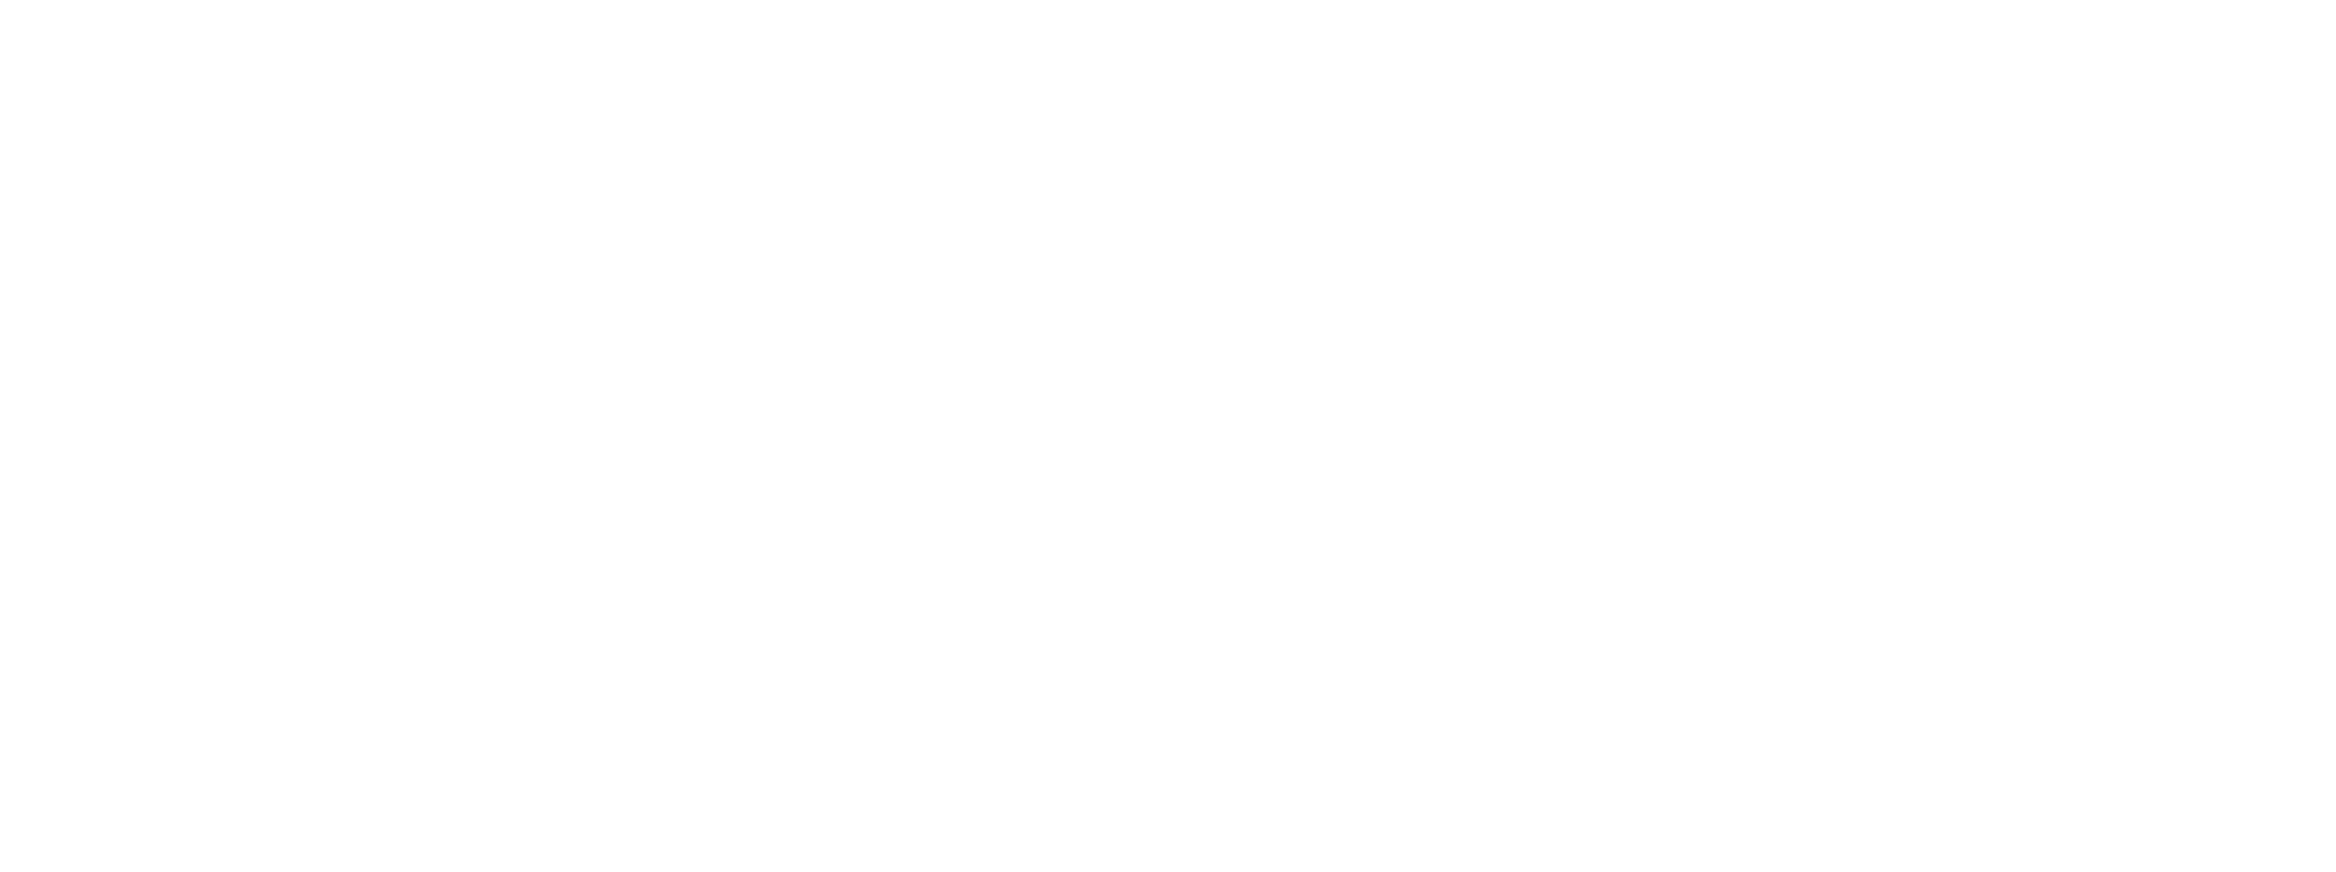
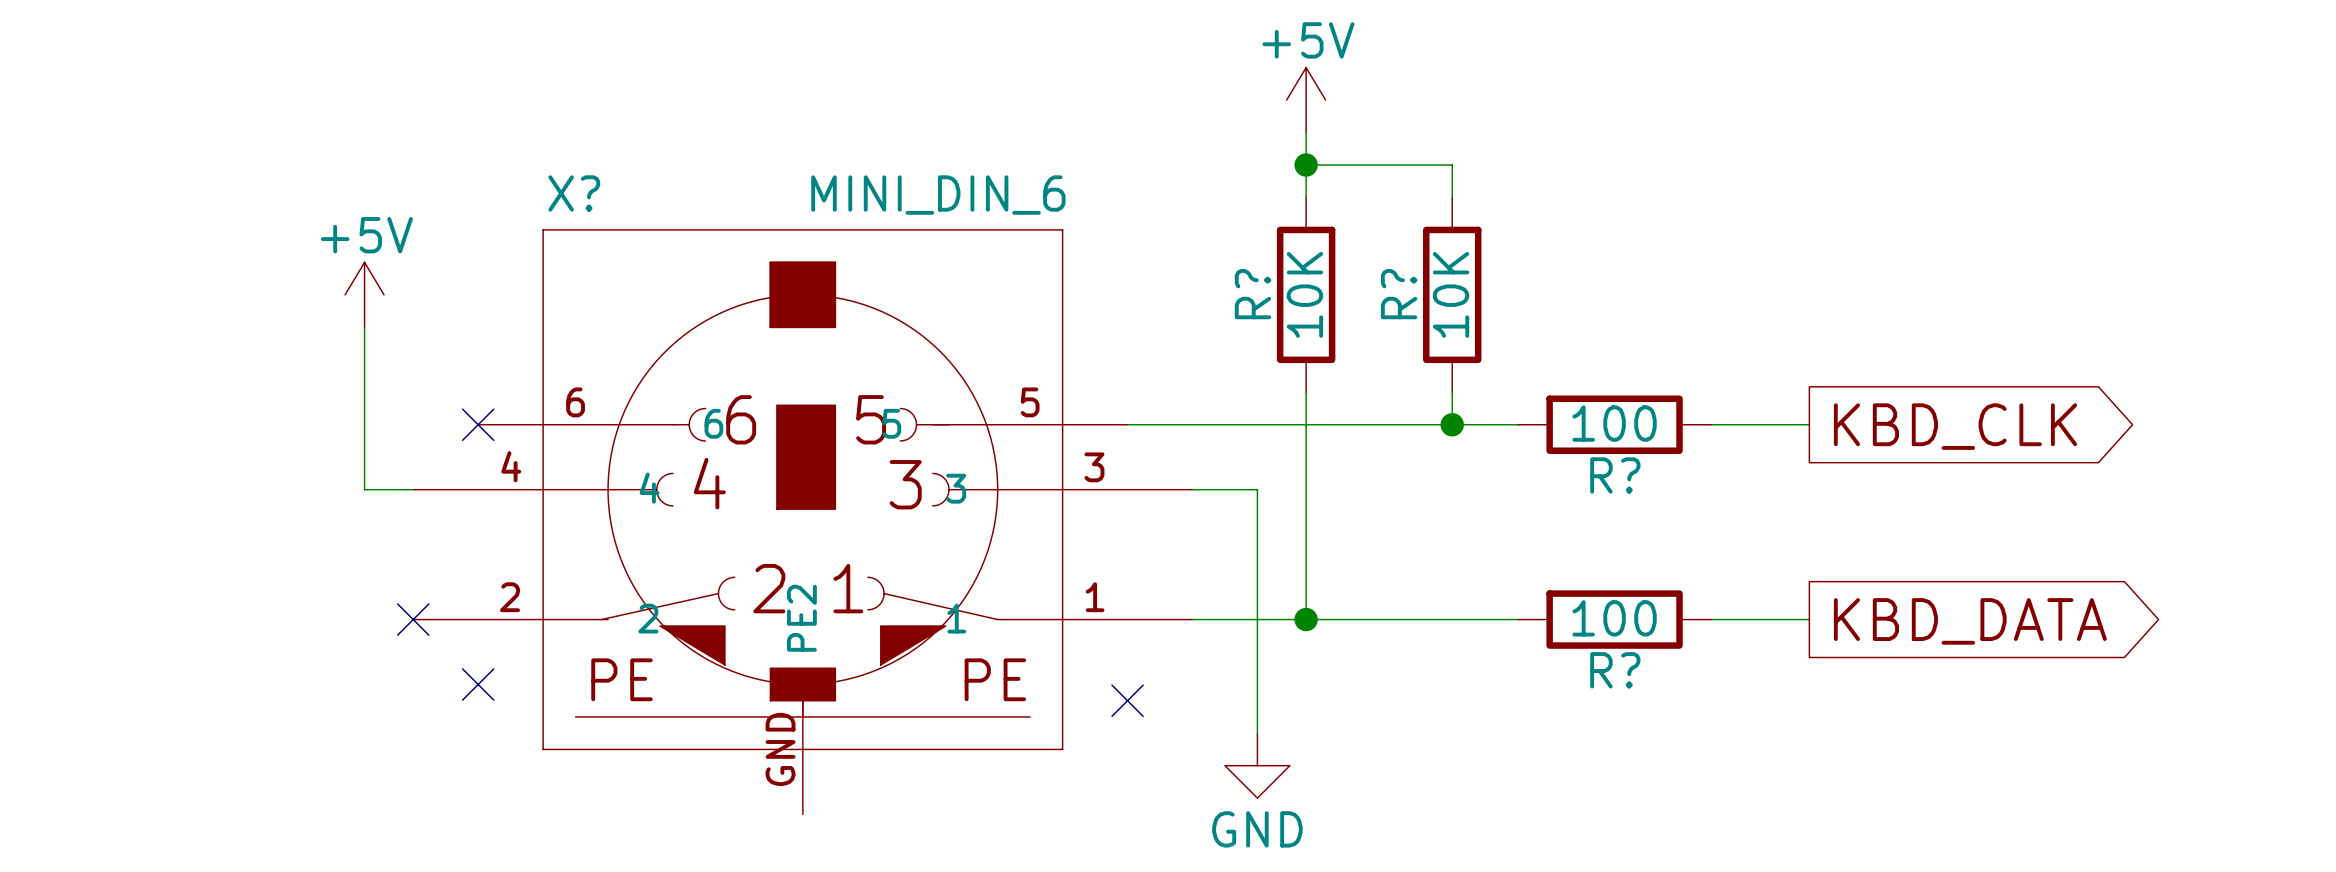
power symbol: none -> +5V (1306, 100)
wire: none -> (1306, 132) (1306, 197)
wire: none -> (1306, 165) (1452, 165) (1452, 197)
junction: none -> (1306, 165)
power symbol: none -> +5V (364, 294)
R?: none -> 10K (1306, 294)
R?: none -> 10K (1452, 294)
wire: none -> (364, 327) (364, 489) (413, 489)
wire: none -> (1306, 392) (1306, 619)
wire: none -> (1452, 392) (1452, 424)
no-connect mark: none -> (478, 424)
wire: none -> (1127, 424) (1517, 424)
junction: none -> (1452, 424)
R?: none -> 100 (1614, 424)
wire: none -> (1711, 424) (1809, 424)
global label: none -> KBD_CLK (1955, 426)
wire: none -> (1192, 489) (1257, 489) (1257, 733)
X?: none -> MINI_DIN_6 (802, 522)
no-connect mark: none -> (413, 619)
wire: none -> (1192, 619) (1517, 619)
junction: none -> (1306, 619)
R?: none -> 100 (1614, 619)
wire: none -> (1711, 619) (1809, 619)
global label: none -> KBD_DATA (1970, 621)
no-connect mark: none -> (478, 684)
no-connect mark: none -> (1127, 700)
power symbol: none -> GND (1257, 765)

